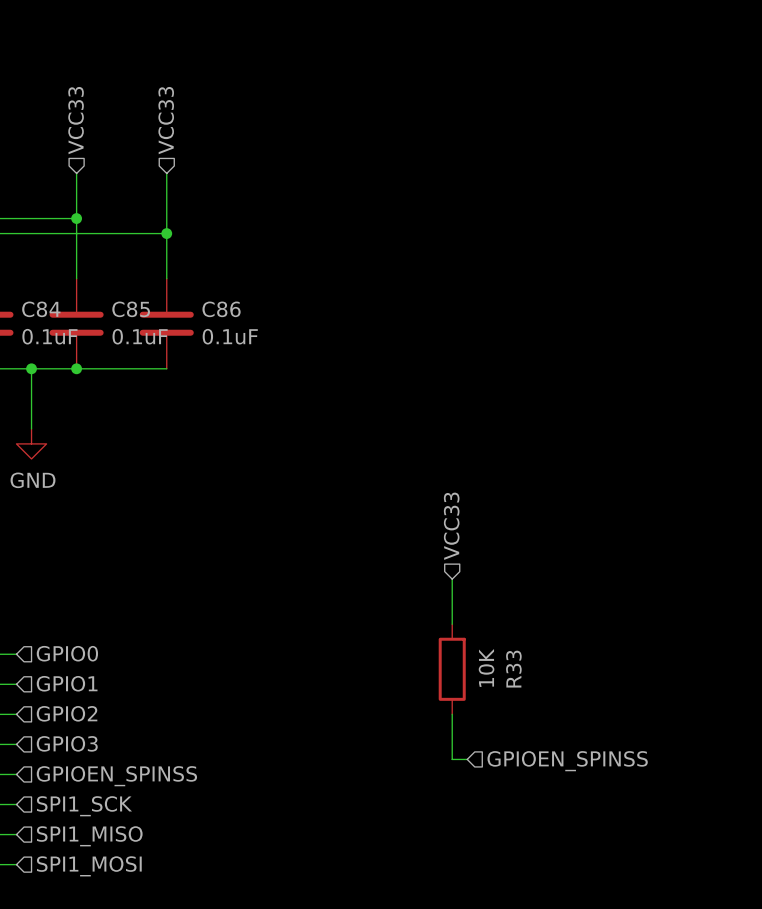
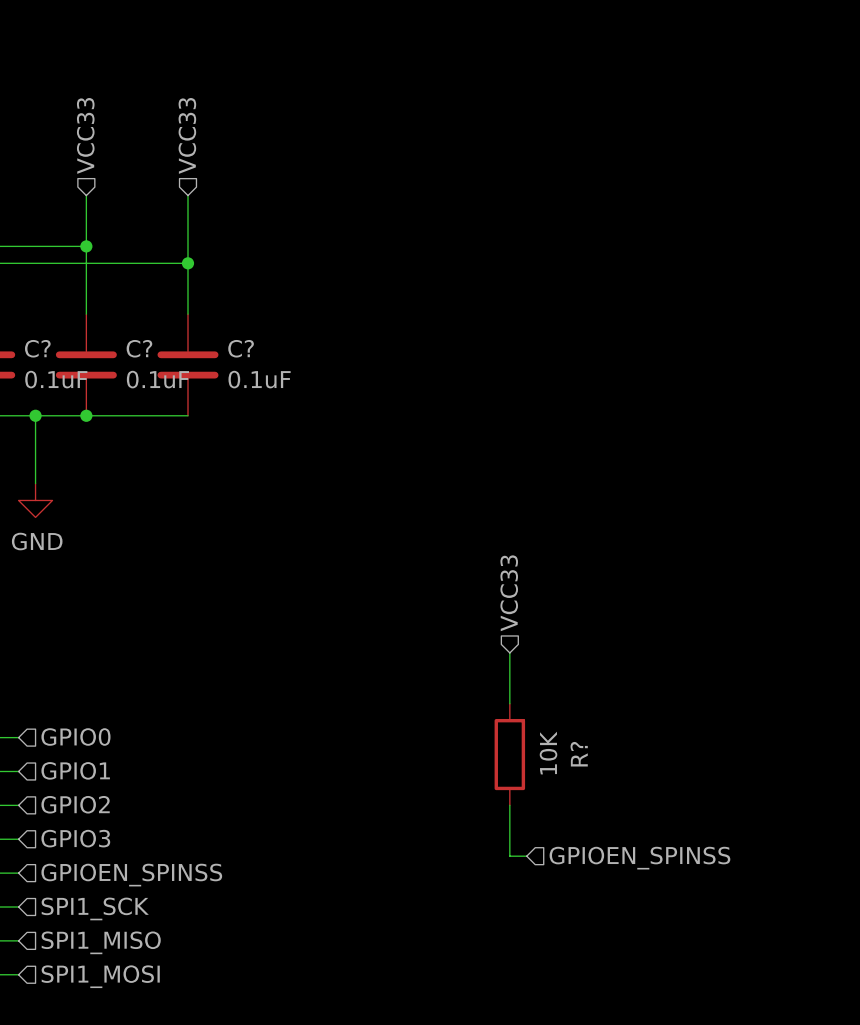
C84 name: C84 (41, 309) -> C? (37, 348)
C85 name: C85 (131, 309) -> C? (139, 348)
C86 name: C86 (221, 309) -> C? (241, 348)
R33 name: R33 (513, 669) -> R? (579, 754)

